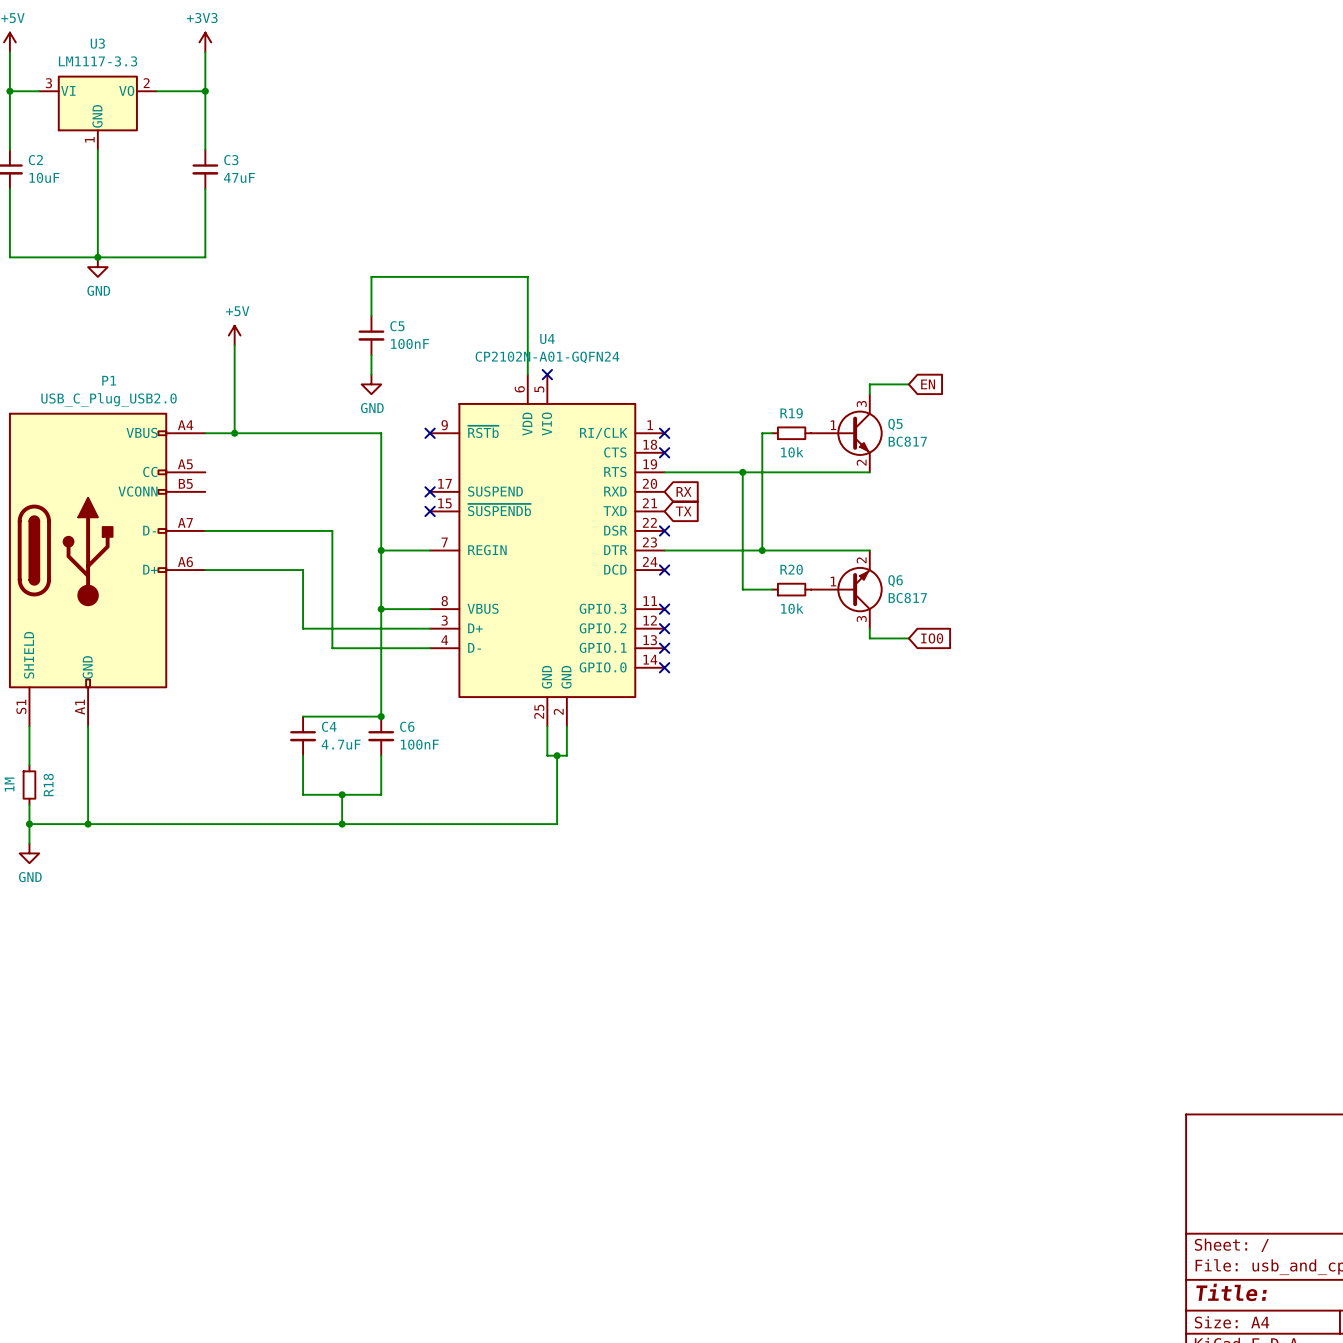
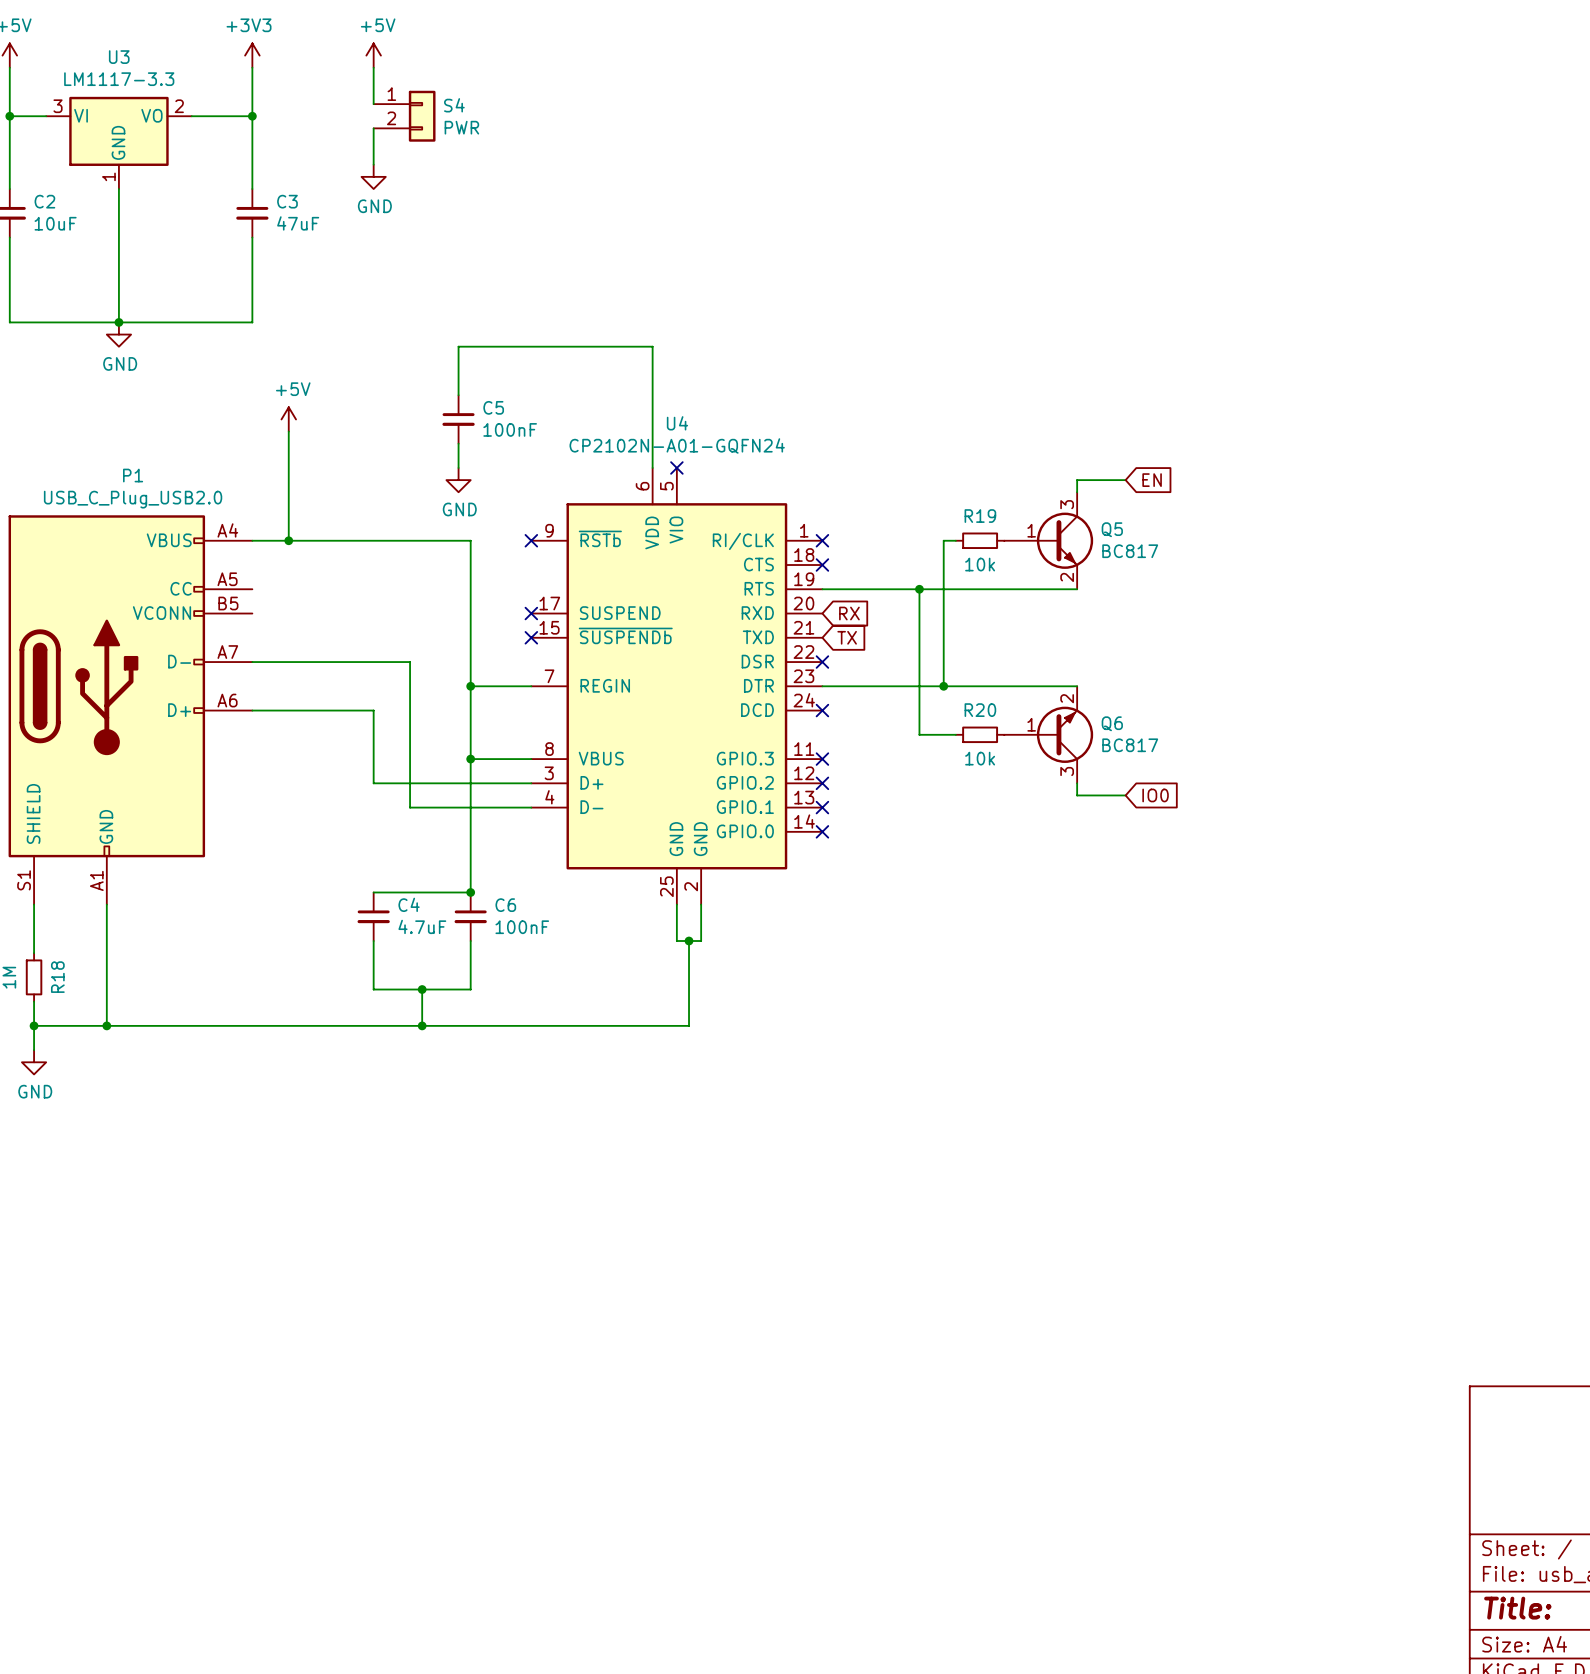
power symbol: none -> +5V (373, 55)
wire: none -> (373, 67) (373, 104)
S4: none -> PWR (404, 116)
wire: none -> (373, 128) (373, 164)
power symbol: none -> GND (373, 176)

